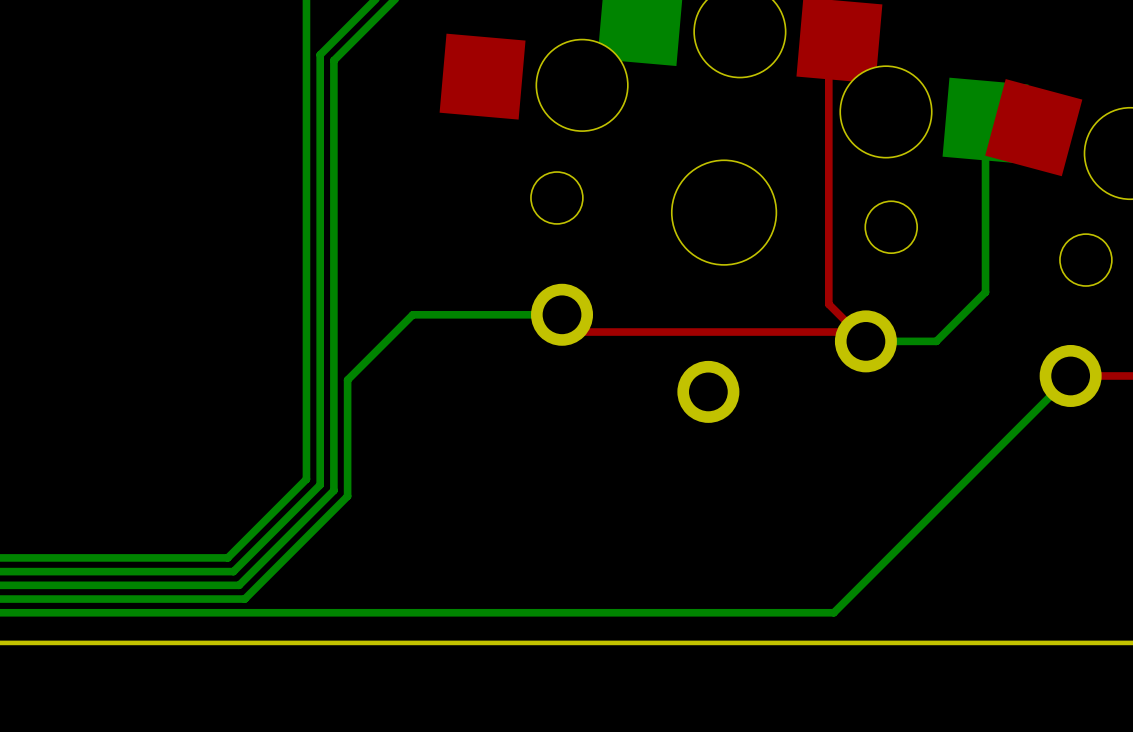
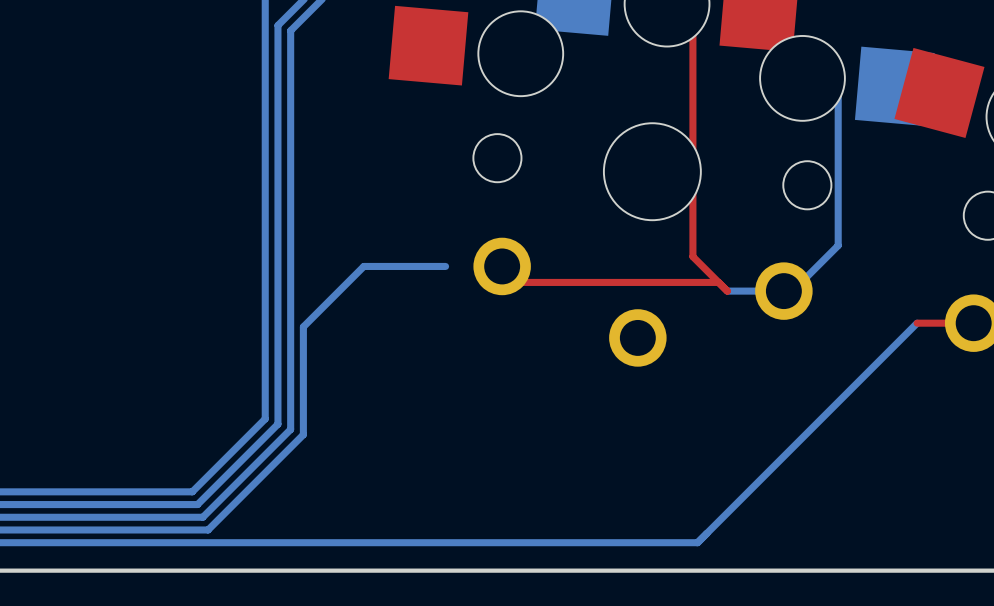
top track: (839, 40) (828, 51) (828, 304) (865, 341) -> (702, 12) (692, 21) (692, 256) (727, 291)
bottom track: (985, 120) (985, 292) (936, 341) (875, 341) -> (838, 86) (838, 245) (792, 291)
bottom track: (501, 314) (562, 314) -> (727, 291) (783, 291)
top track: (795, 332) (856, 332) -> (917, 323) (973, 323)
bottom track: (1070, 375) (833, 612) (772, 612) -> (917, 323) (697, 542)

